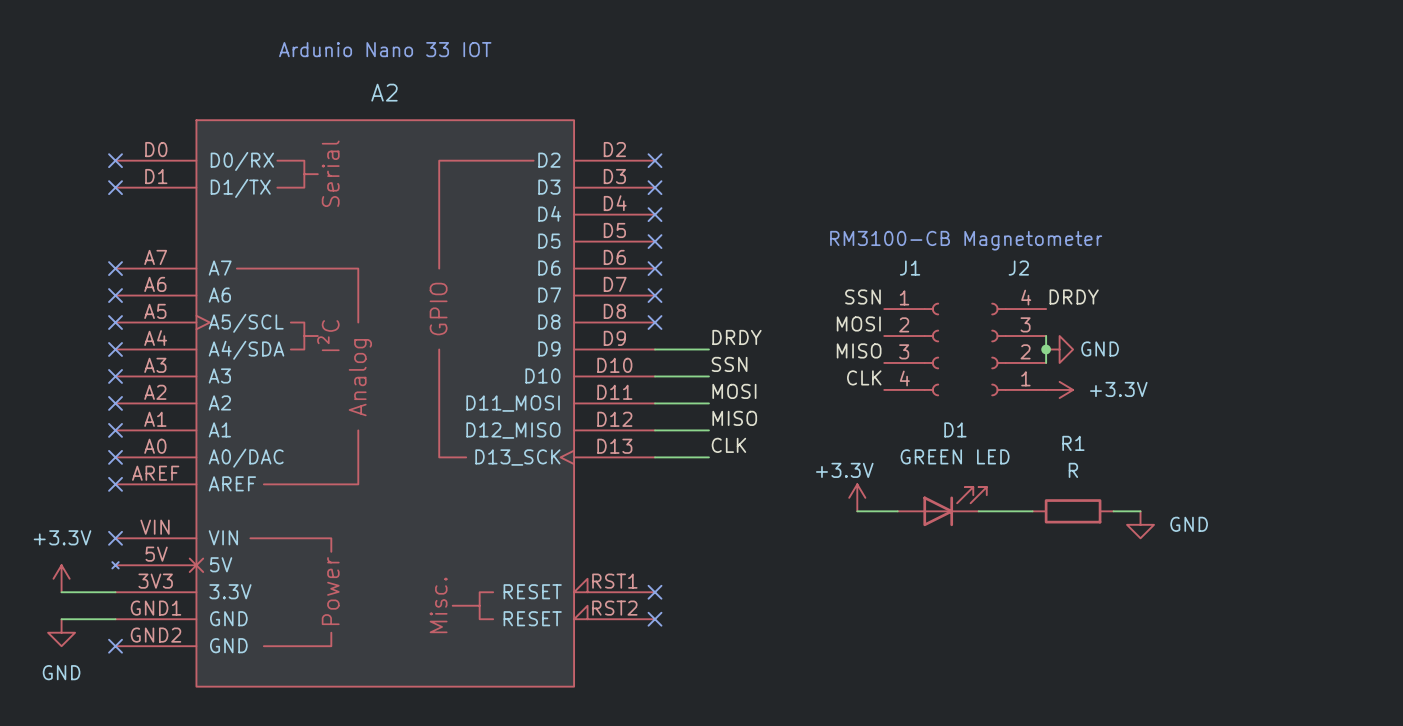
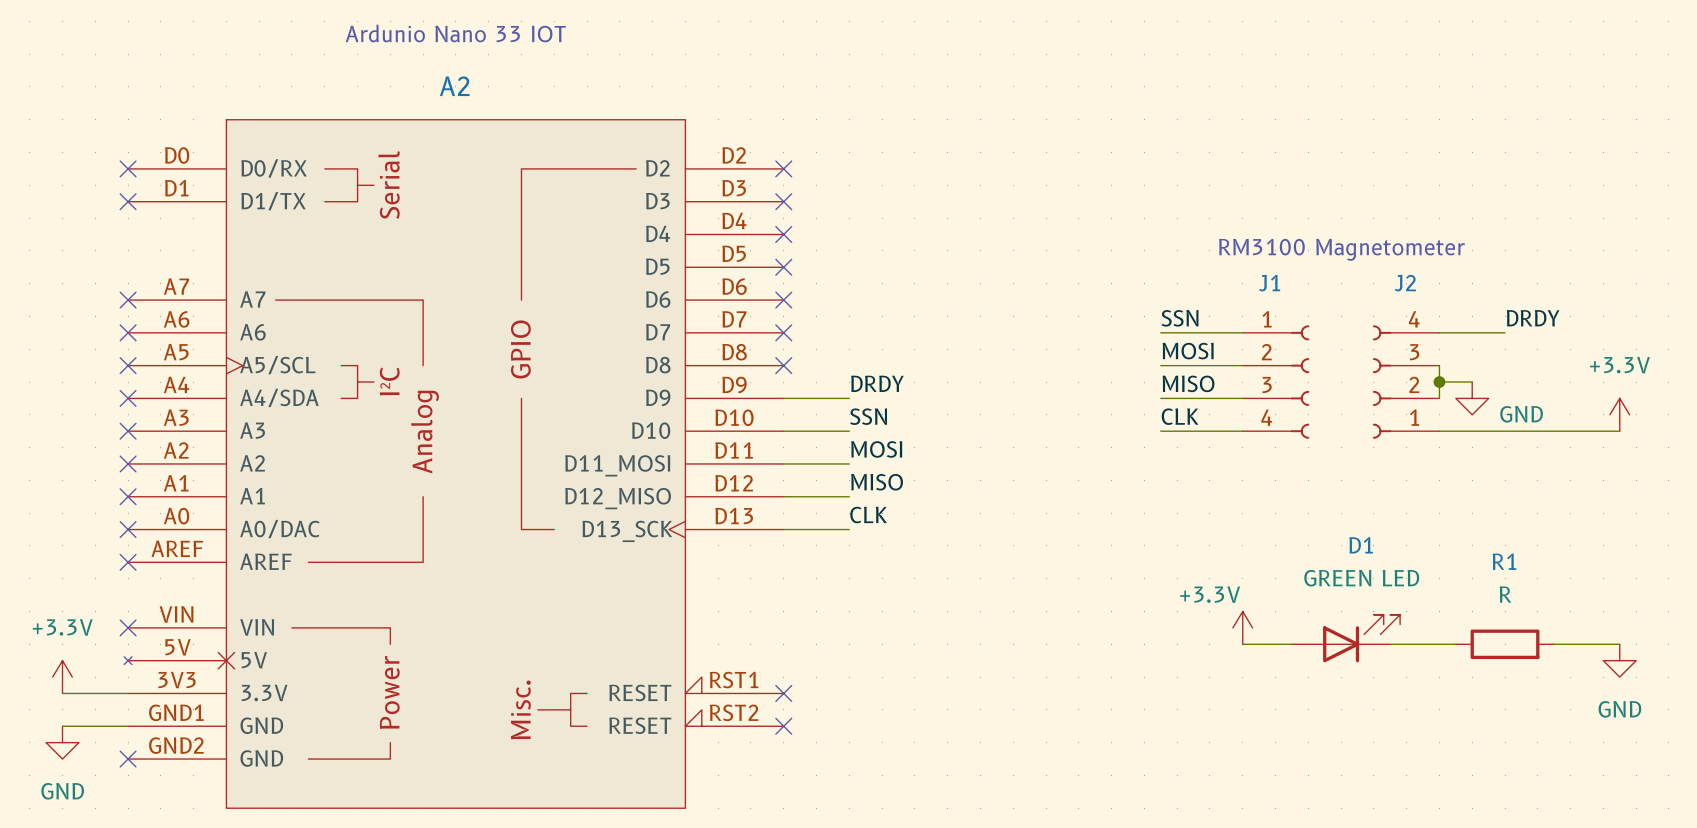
text: RM3100-CB Magnetometer (966, 240) -> RM3100 Magnetometer (1341, 249)
wire: none -> (1160, 332) (1242, 332)
wire: none -> (1439, 332) (1505, 332)
label position: SSN (862, 296) -> SSN (1180, 318)
label position: DRDY (1074, 296) -> DRDY (1533, 318)
wire: none -> (1160, 365) (1242, 365)
label position: MOSI (858, 323) -> MOSI (1188, 351)
wire: (1046, 336) (1046, 362) -> (1439, 365) (1439, 398)
junction: none -> (1439, 382)
J1 position: (911, 349) -> (1276, 382)
wire: none -> (1160, 398) (1242, 398)
J2 position: (1018, 349) -> (1406, 382)
junction: (1046, 349) -> none
power symbol: GND (1059, 349) -> none
power symbol: none -> GND (1472, 398)
label position: MISO (859, 350) -> MISO (1188, 383)
power symbol: none -> +3.3V (1619, 414)
wire: none -> (1160, 431) (1242, 431)
wire: none -> (1439, 431) (1619, 431)
label position: CLK (864, 377) -> CLK (1180, 416)
power symbol: +3.3V (1059, 389) -> none
power symbol: +3.3V (857, 497) -> none
D1 position: (942, 506) -> (1346, 638)
wire: (857, 511) (897, 511) -> (1242, 644) (1291, 644)
wire: (978, 511) (1032, 511) -> (1390, 644) (1455, 644)
R1 position: (1073, 511) -> (1505, 644)
wire: (1113, 511) (1140, 511) -> (1439, 382) (1472, 382)
power symbol: GND (1140, 524) -> none
power symbol: none -> +3.3V (1242, 627)
wire: none -> (1554, 644) (1619, 644)
power symbol: none -> GND (1619, 660)

